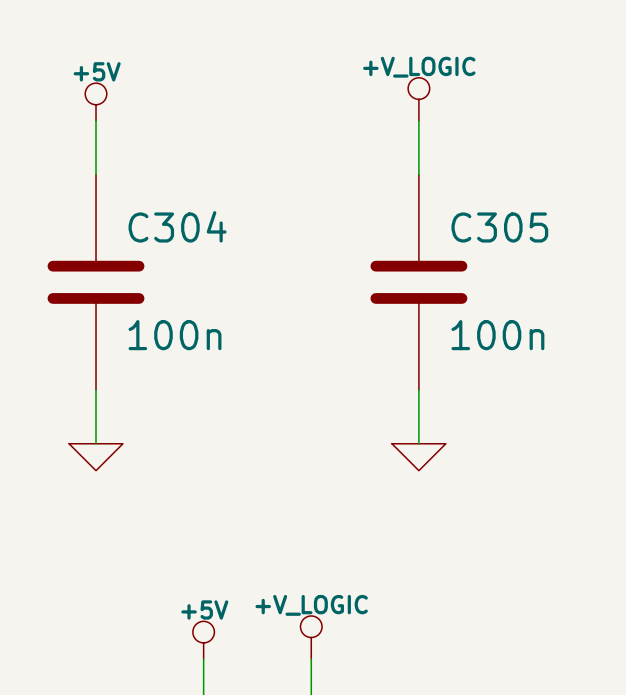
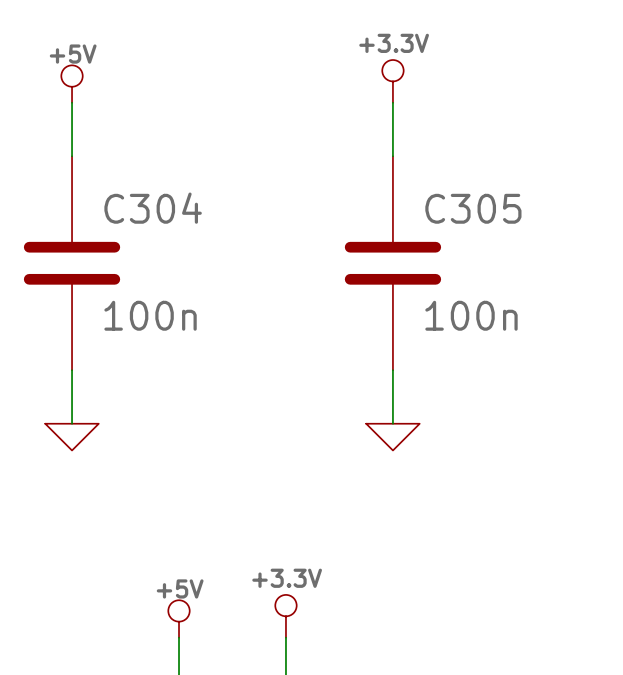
power symbol: +V_LOGIC (418, 99) -> +3.3V (392, 81)
power symbol: +V_LOGIC (311, 637) -> +3.3V (285, 616)

